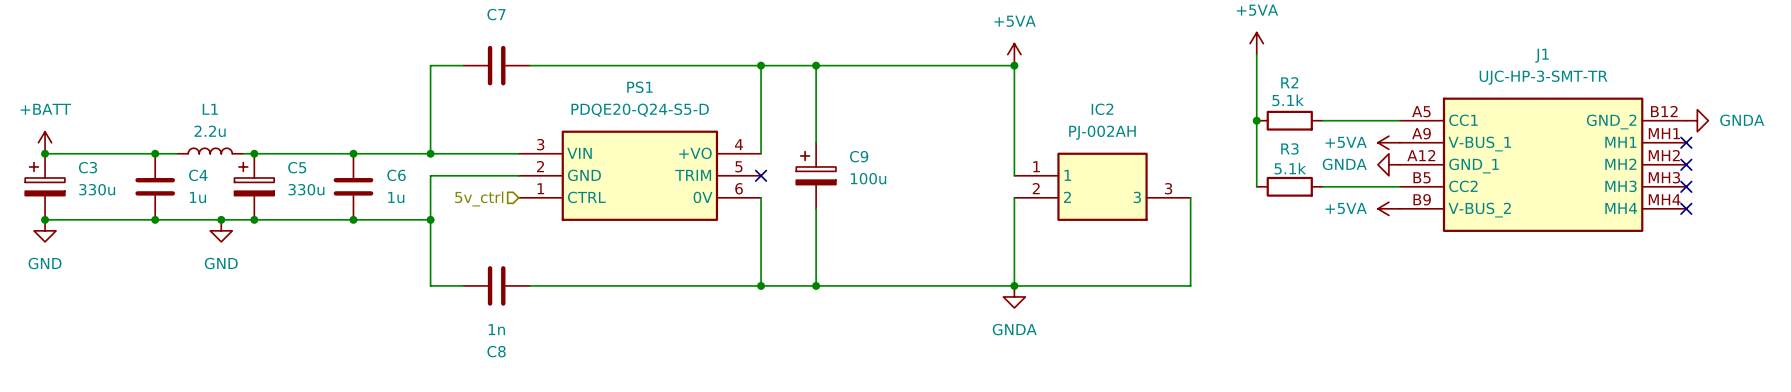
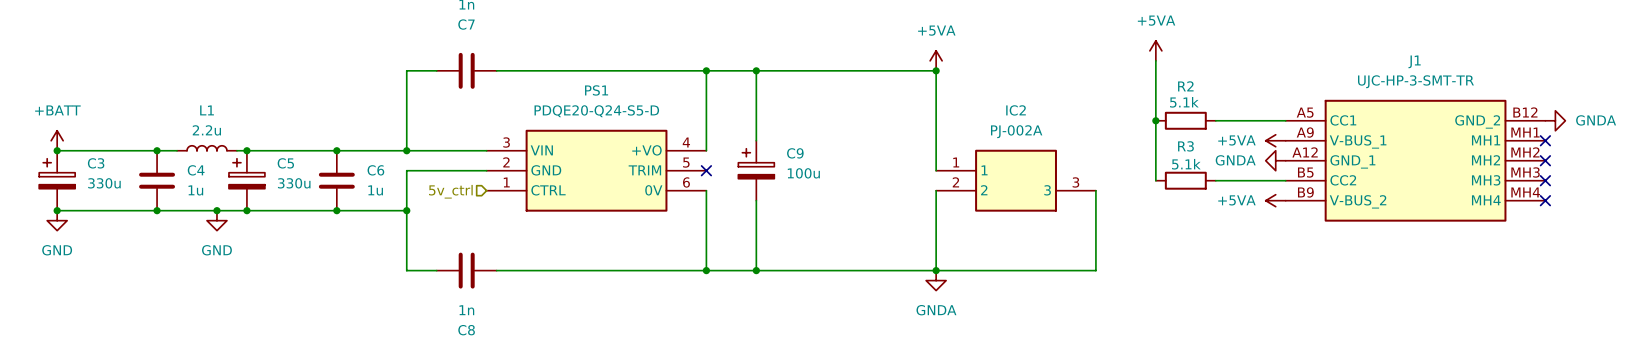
IC2 value: PJ-002AH (1102, 132) -> PJ-002A (1016, 131)

